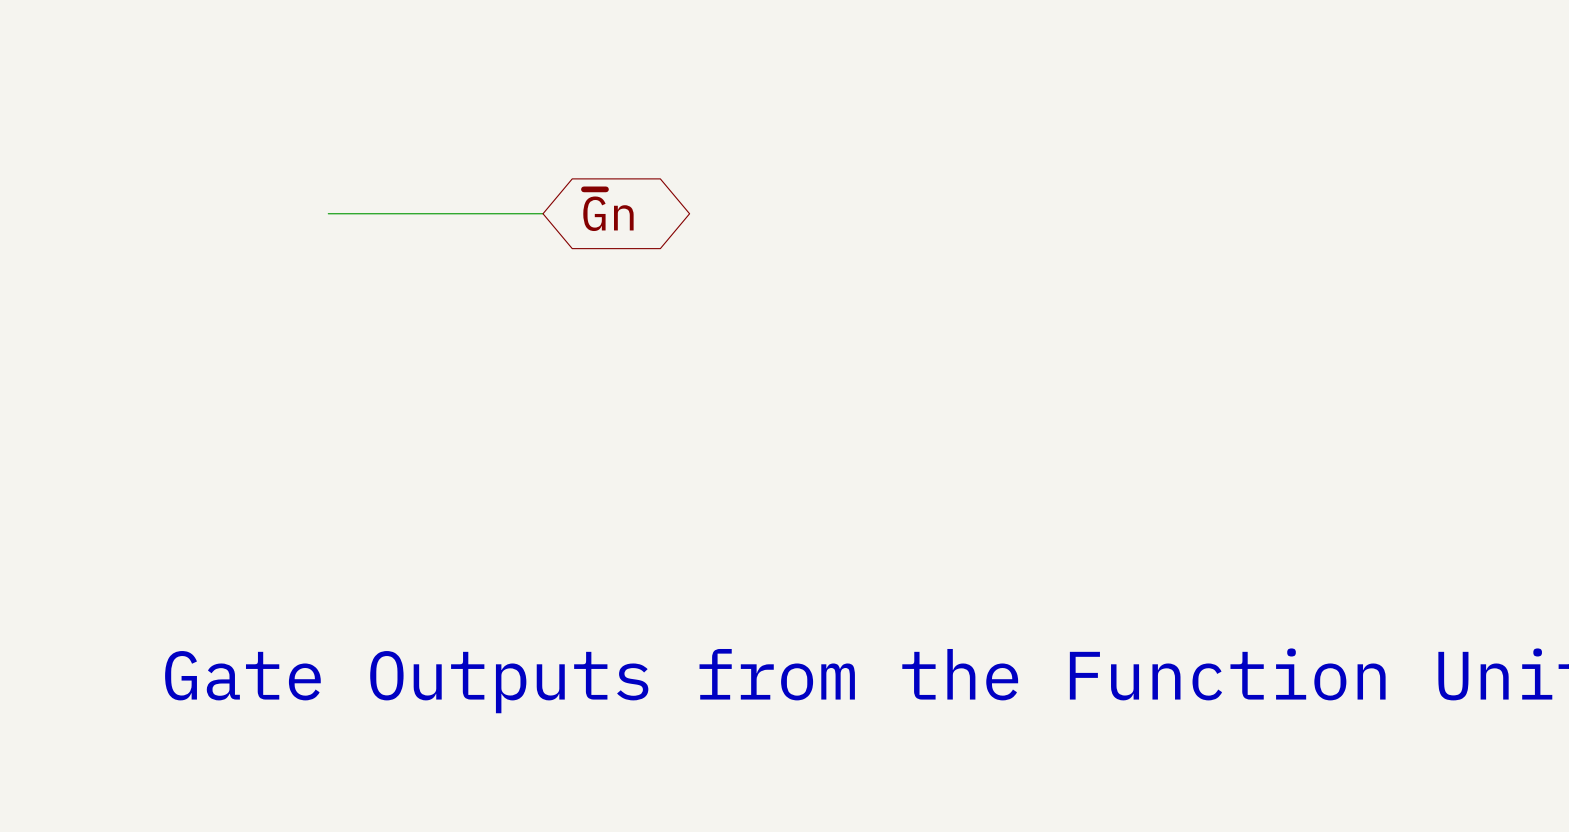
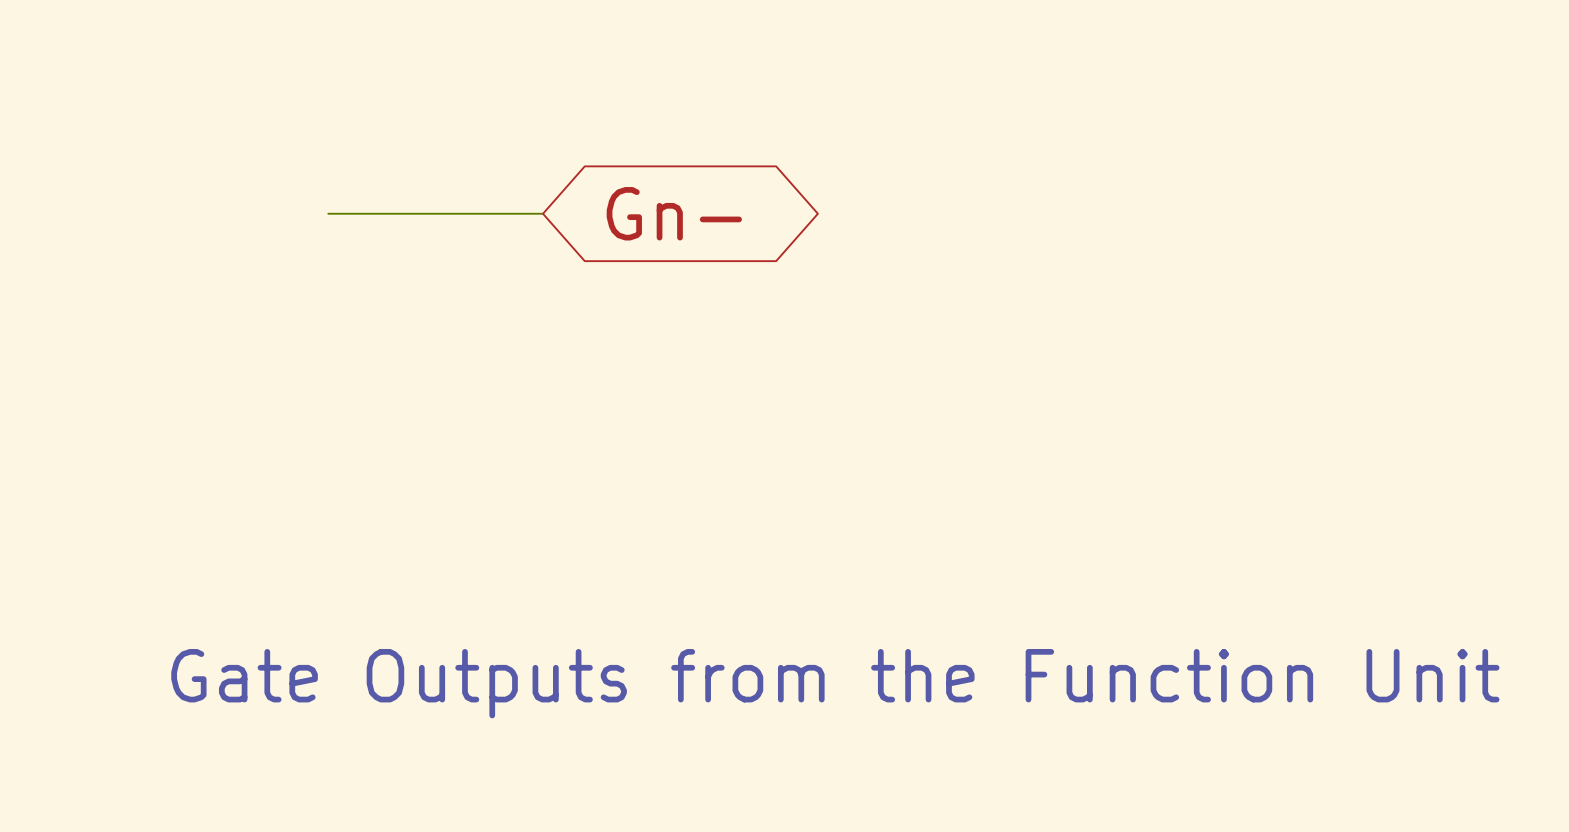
global label: ~{G}n (608, 210) -> Gn- (674, 213)

